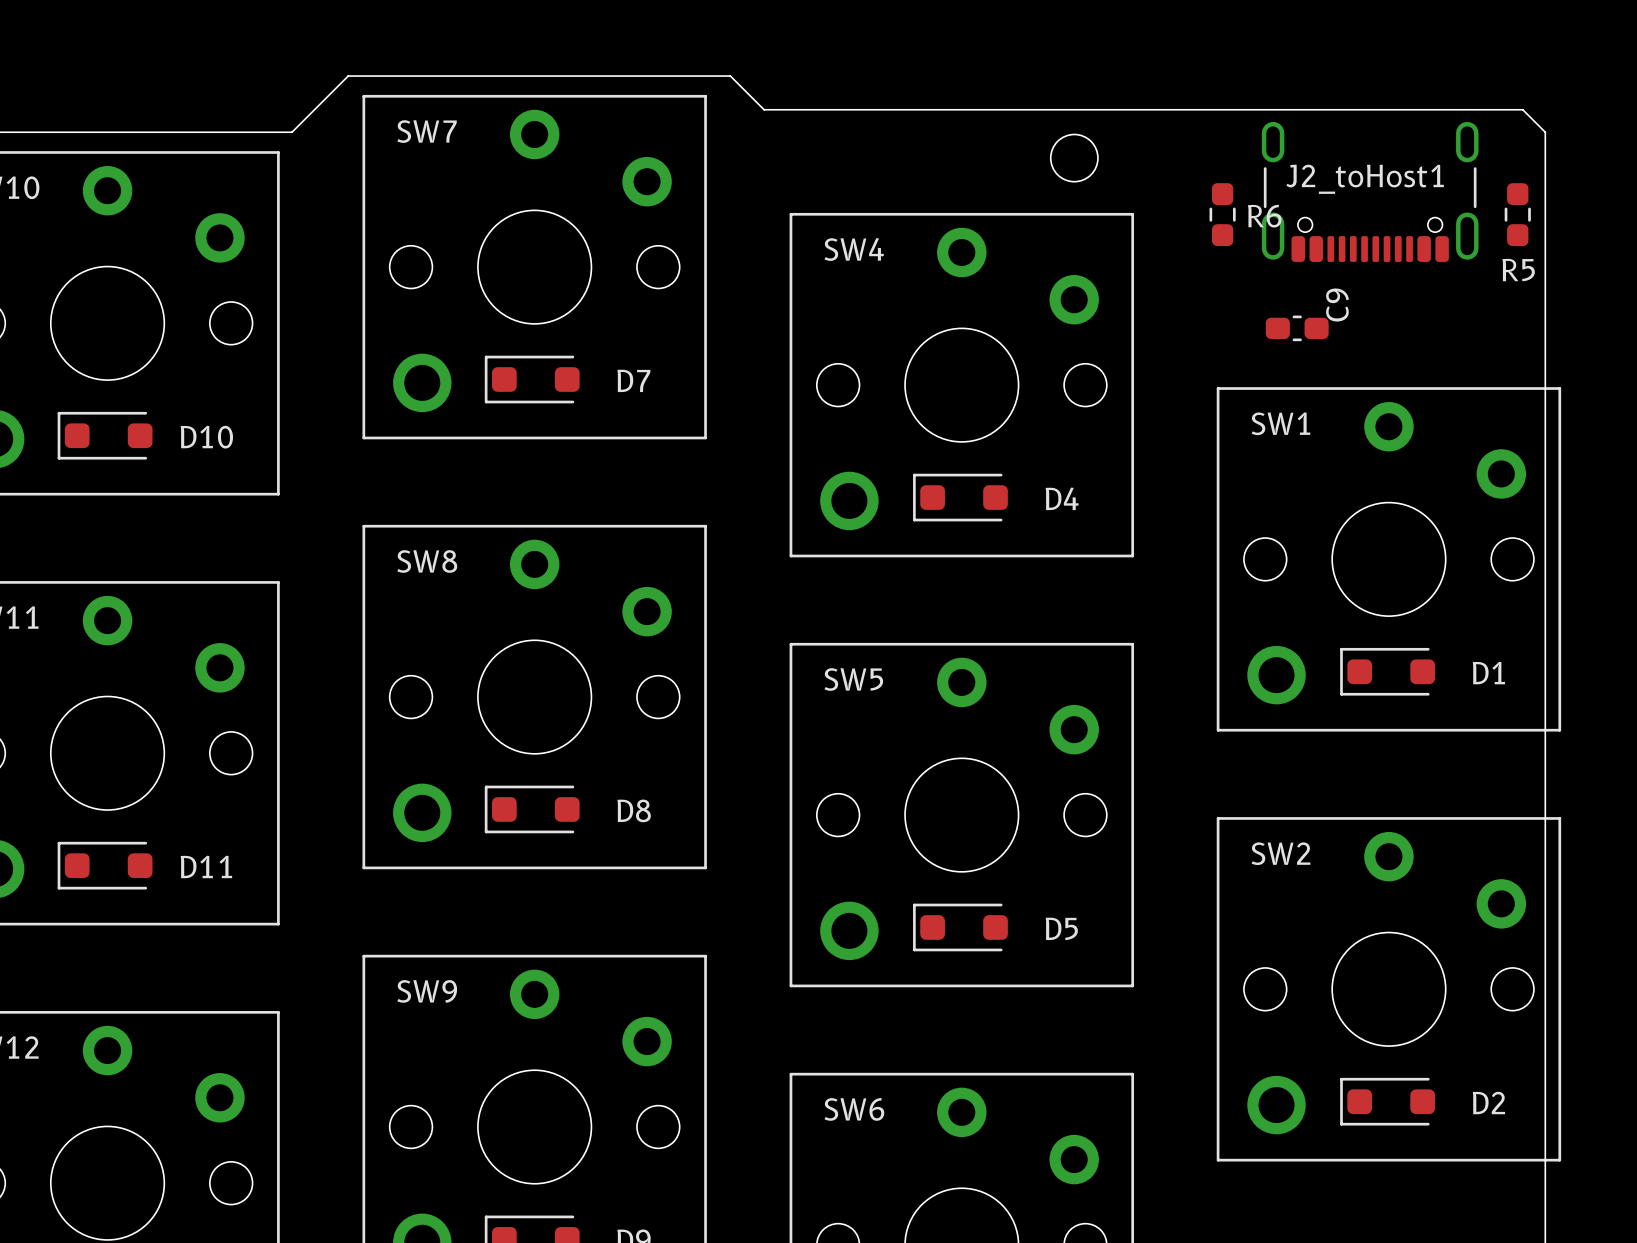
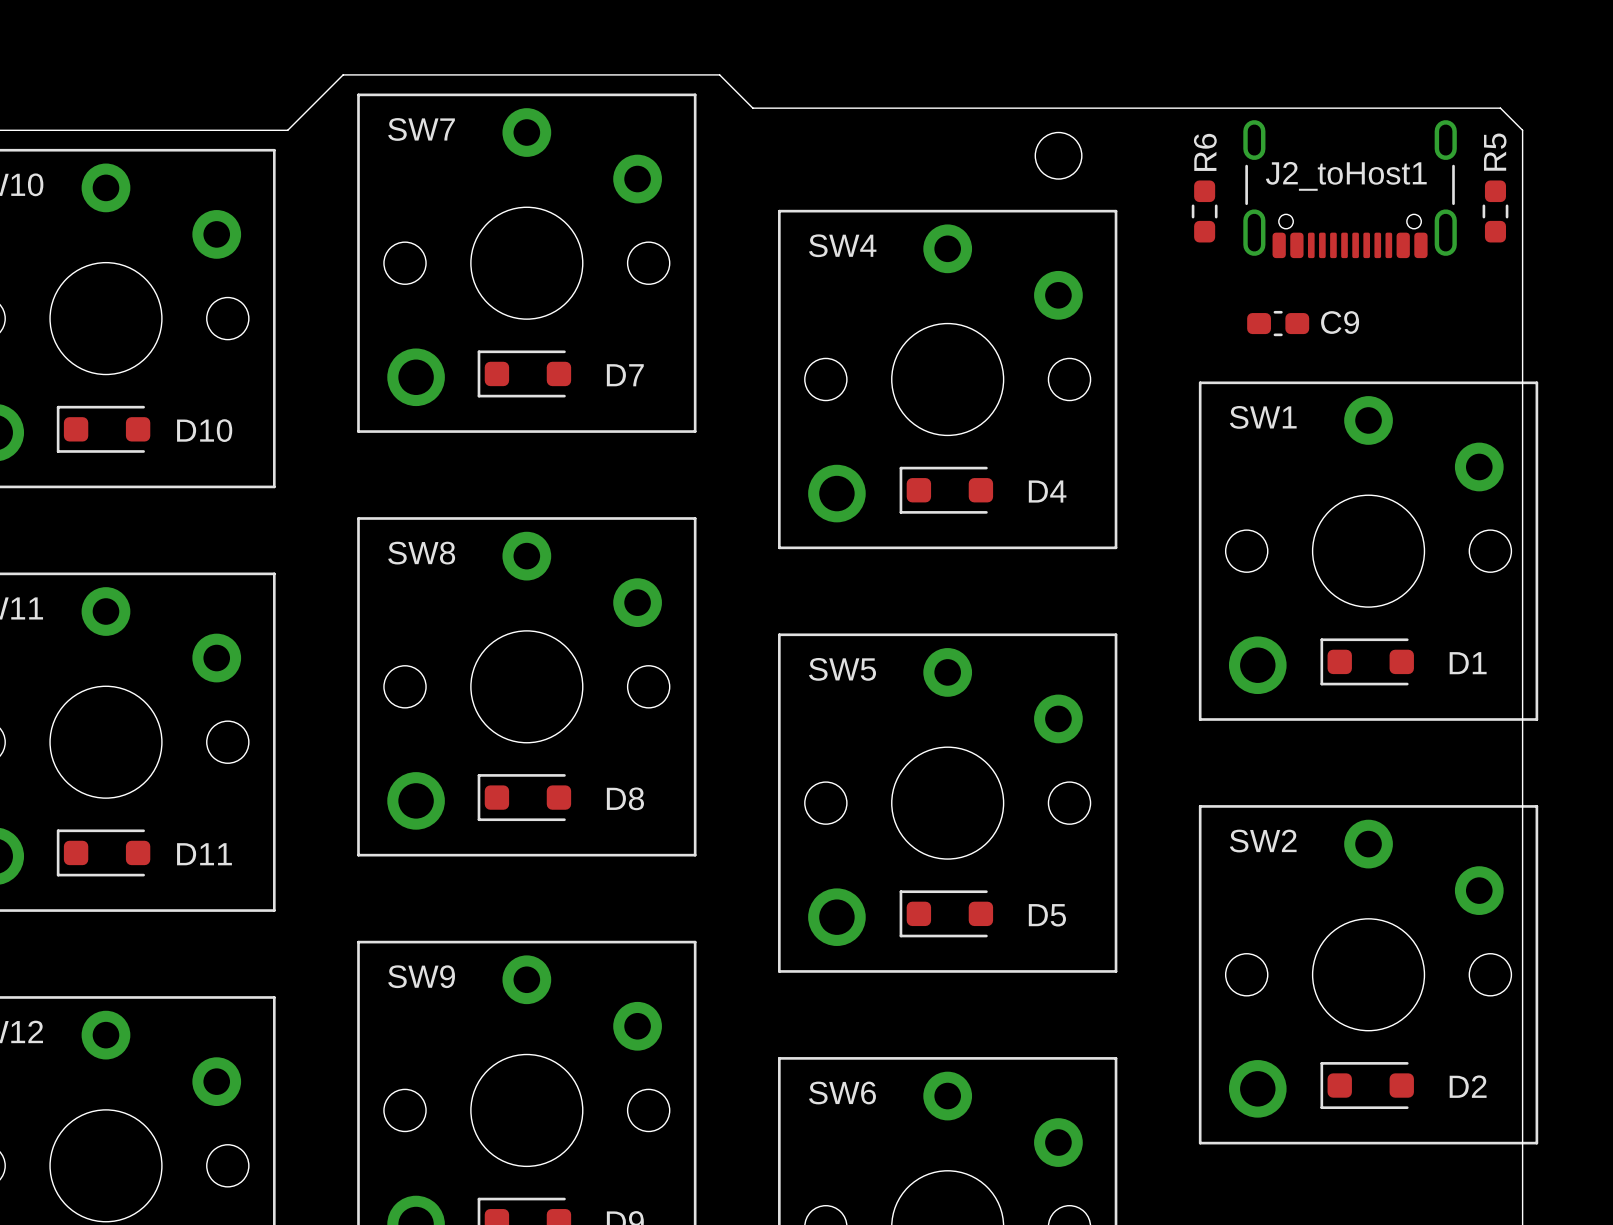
R6 name rotation: 0° (1264, 216) -> 90° counterclockwise (1205, 152)
R6 name position: R6 (1264, 216) -> R6 (1205, 152)
R5 name rotation: 0° (1518, 270) -> 90° counterclockwise (1495, 152)
R5 name position: R5 (1518, 270) -> R5 (1495, 152)
C9 name rotation: 0° (1337, 305) -> 90° clockwise (1340, 322)

